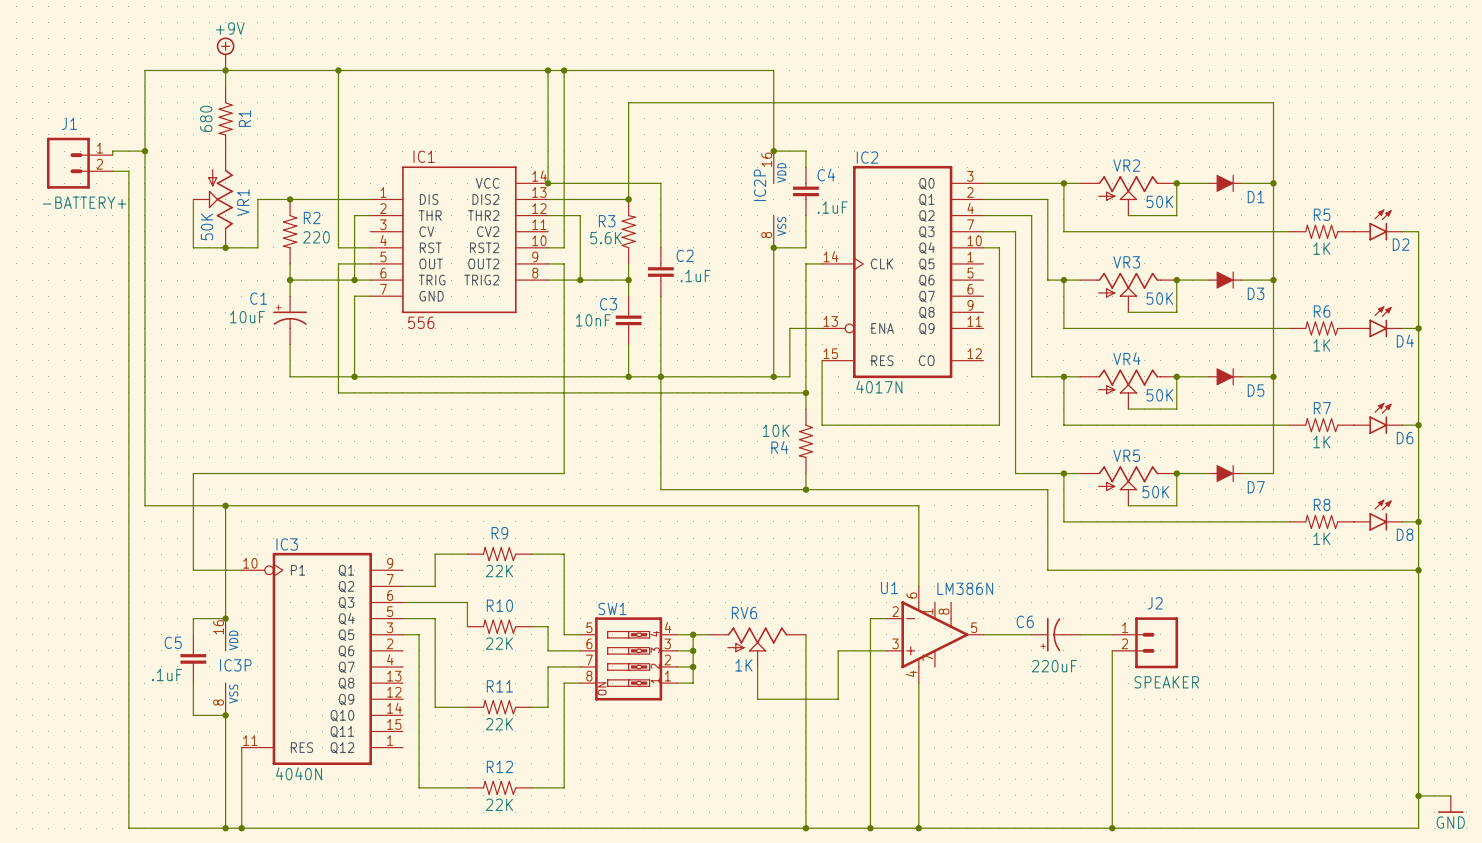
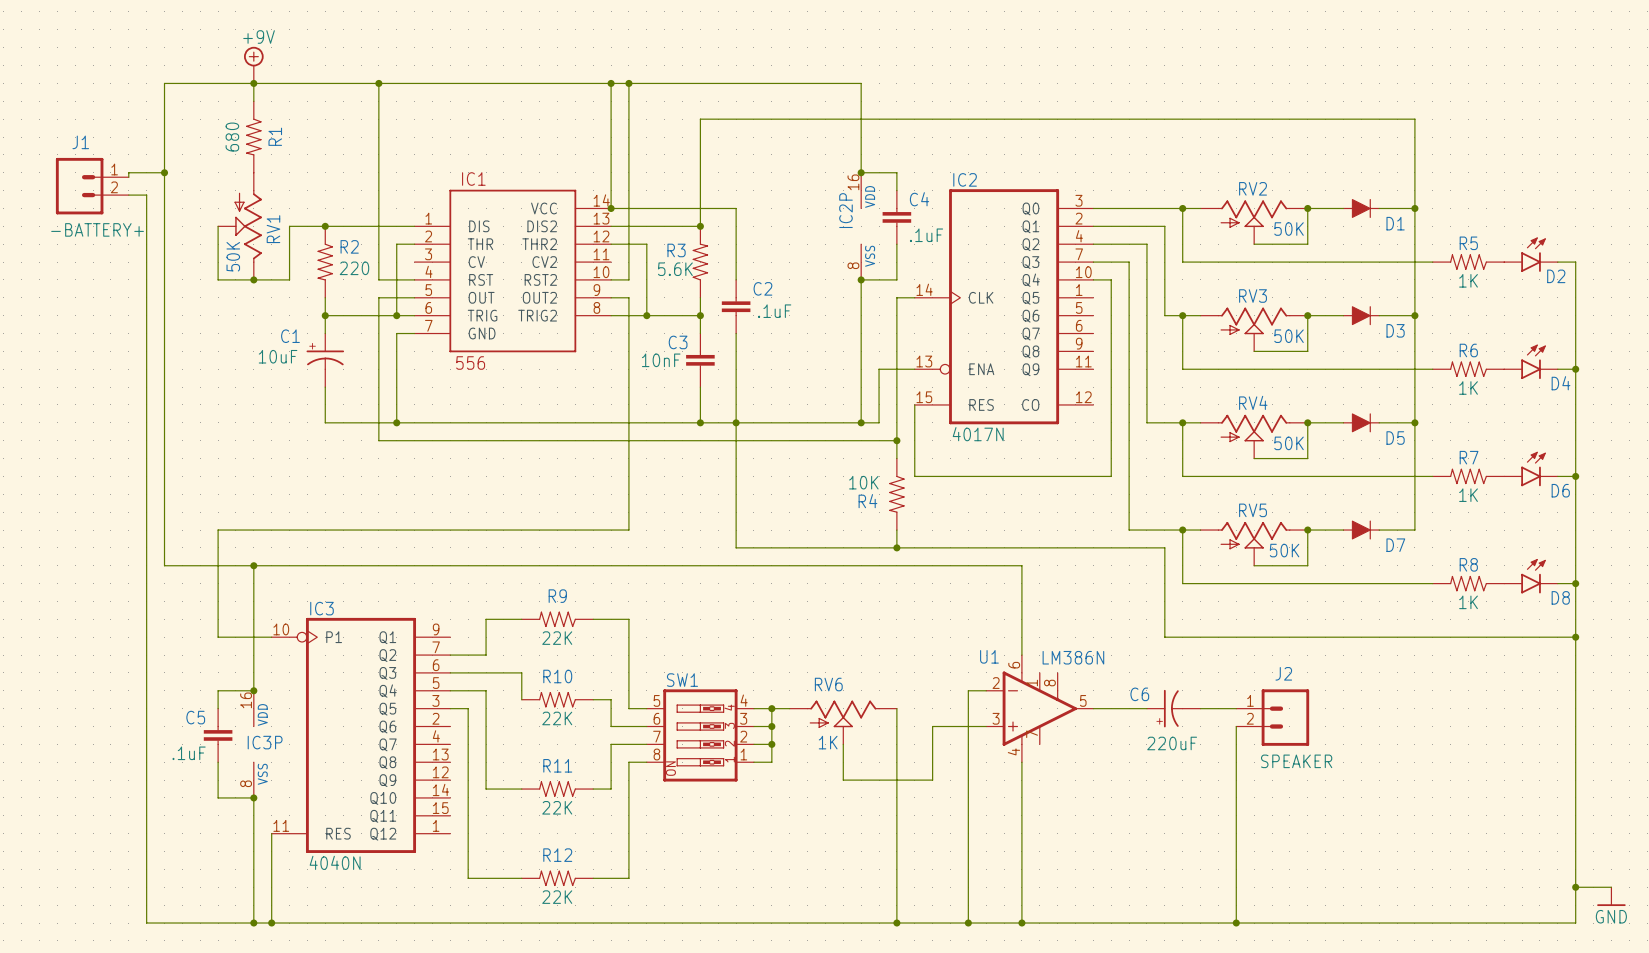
VR2 name: VR2 (1126, 165) -> RV2 (1253, 188)
VR1 name: VR1 (243, 202) -> RV1 (273, 229)
VR3 name: VR3 (1126, 262) -> RV3 (1253, 296)
VR4 name: VR4 (1126, 358) -> RV4 (1253, 402)
VR5 name: VR5 (1126, 455) -> RV5 (1253, 510)

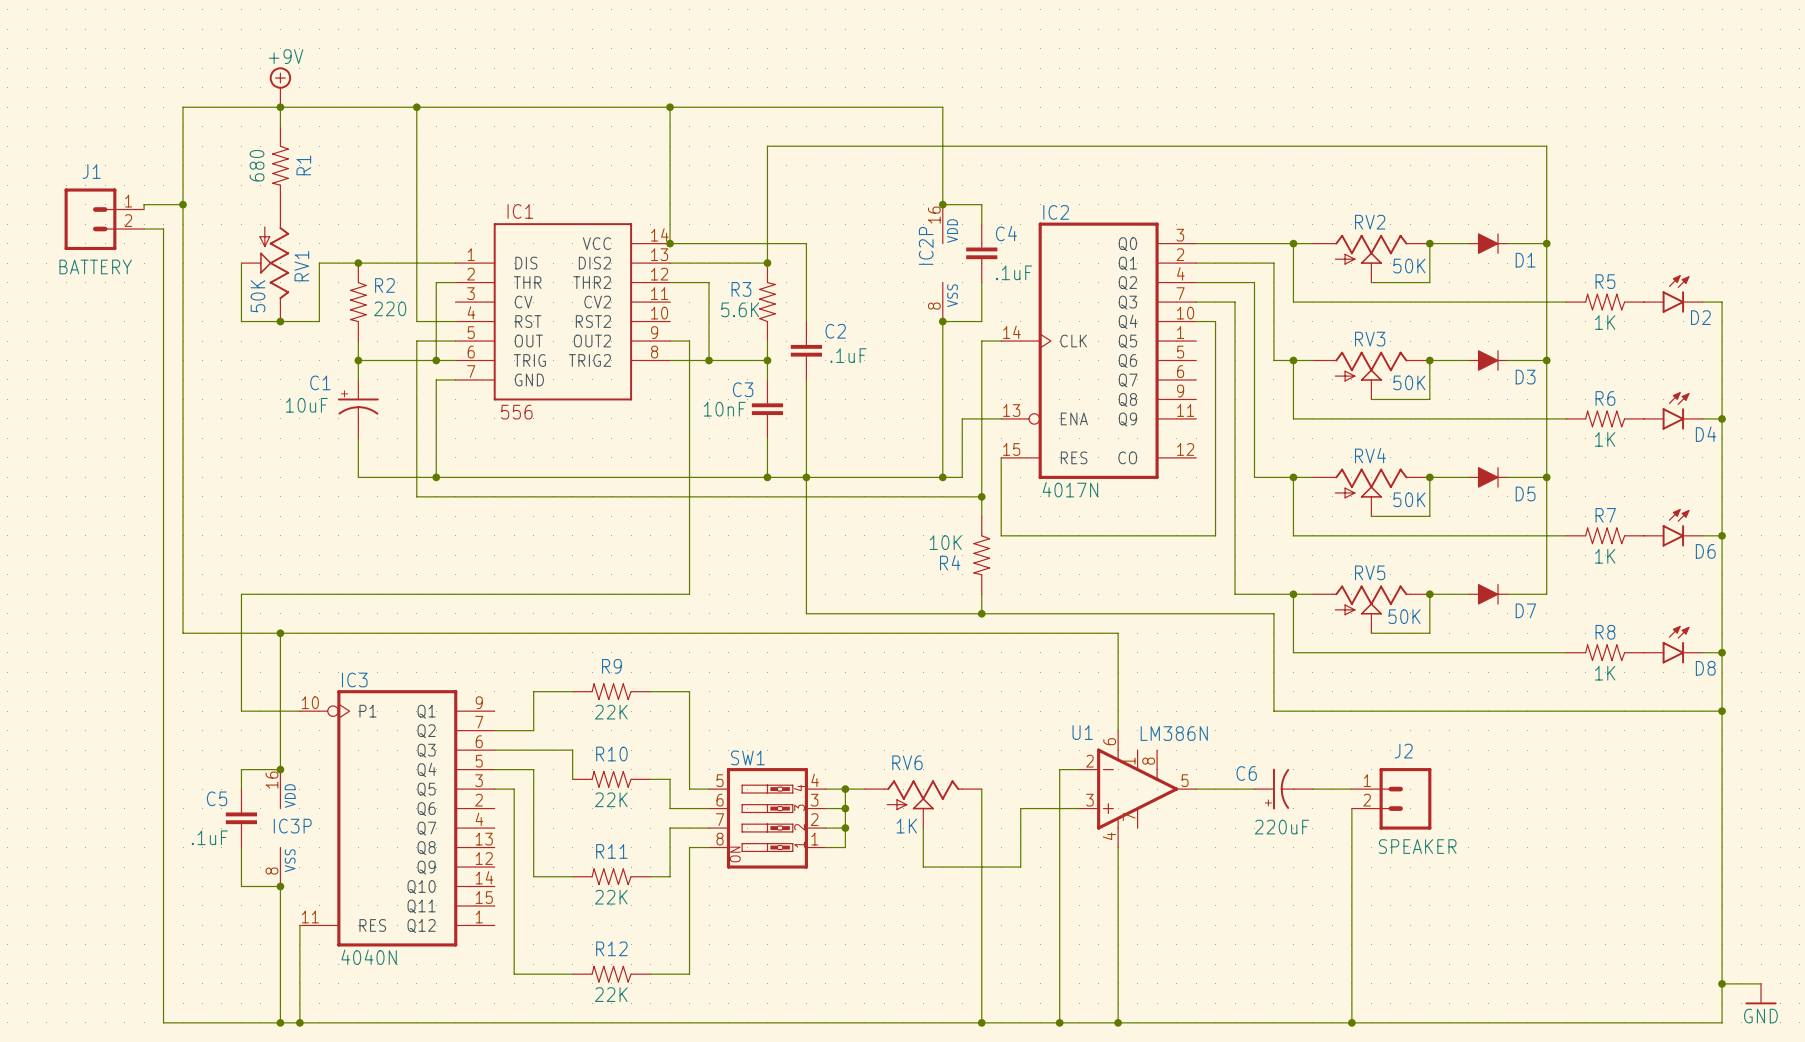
wire: (628, 83) (628, 279) (611, 279) -> none
junction: (628, 83) -> none
J1 value: -BATTERY+ (97, 229) -> BATTERY (95, 266)

